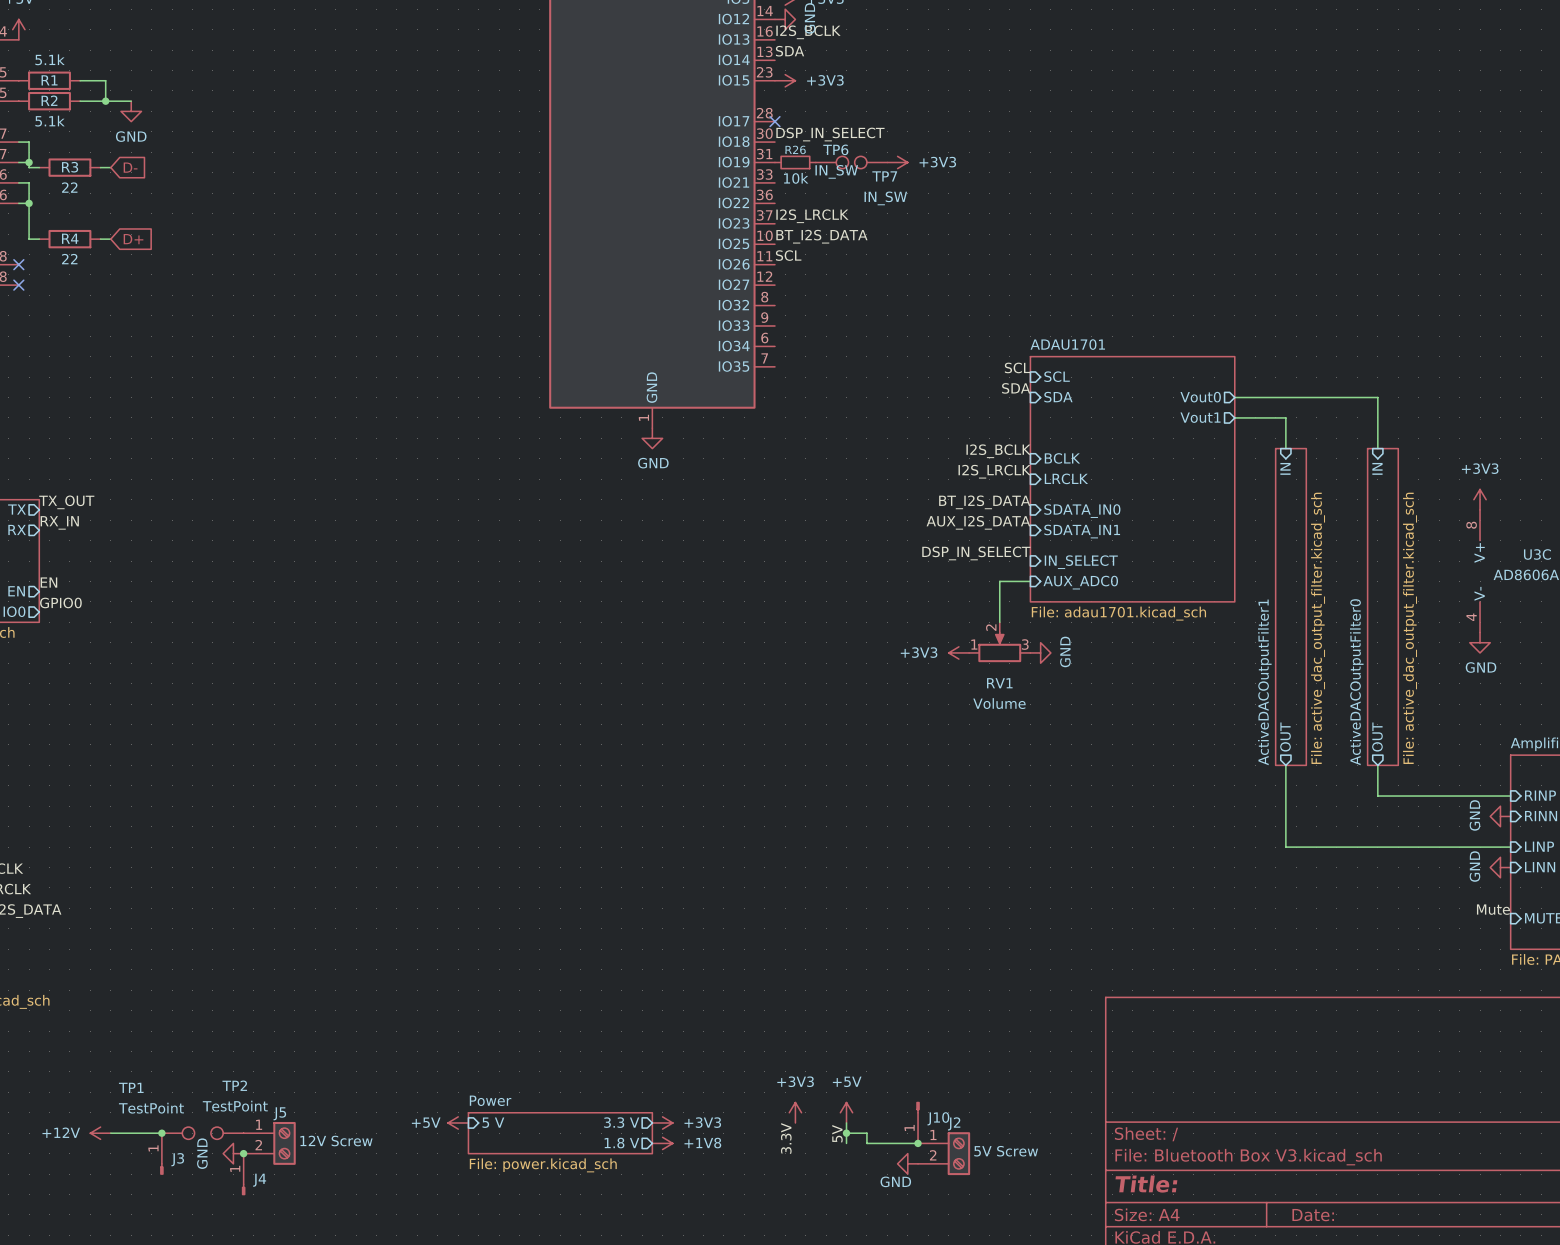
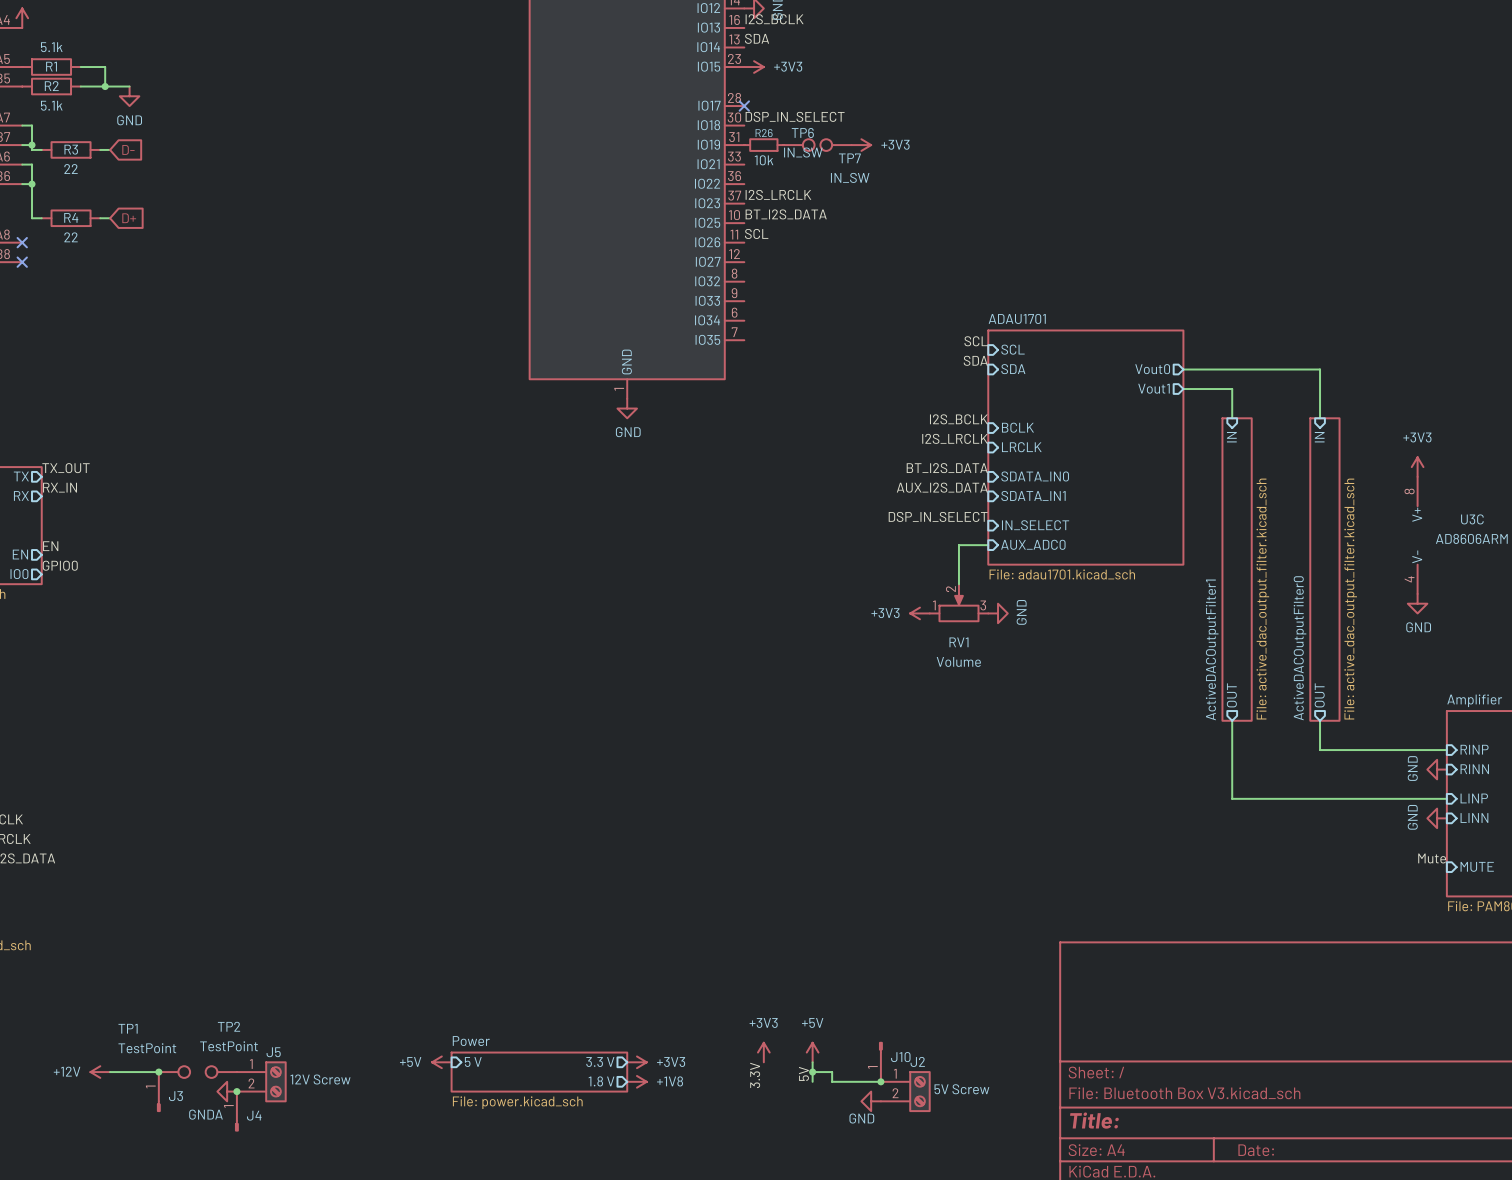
power symbol: GND (233, 1153) -> GNDA (227, 1091)

